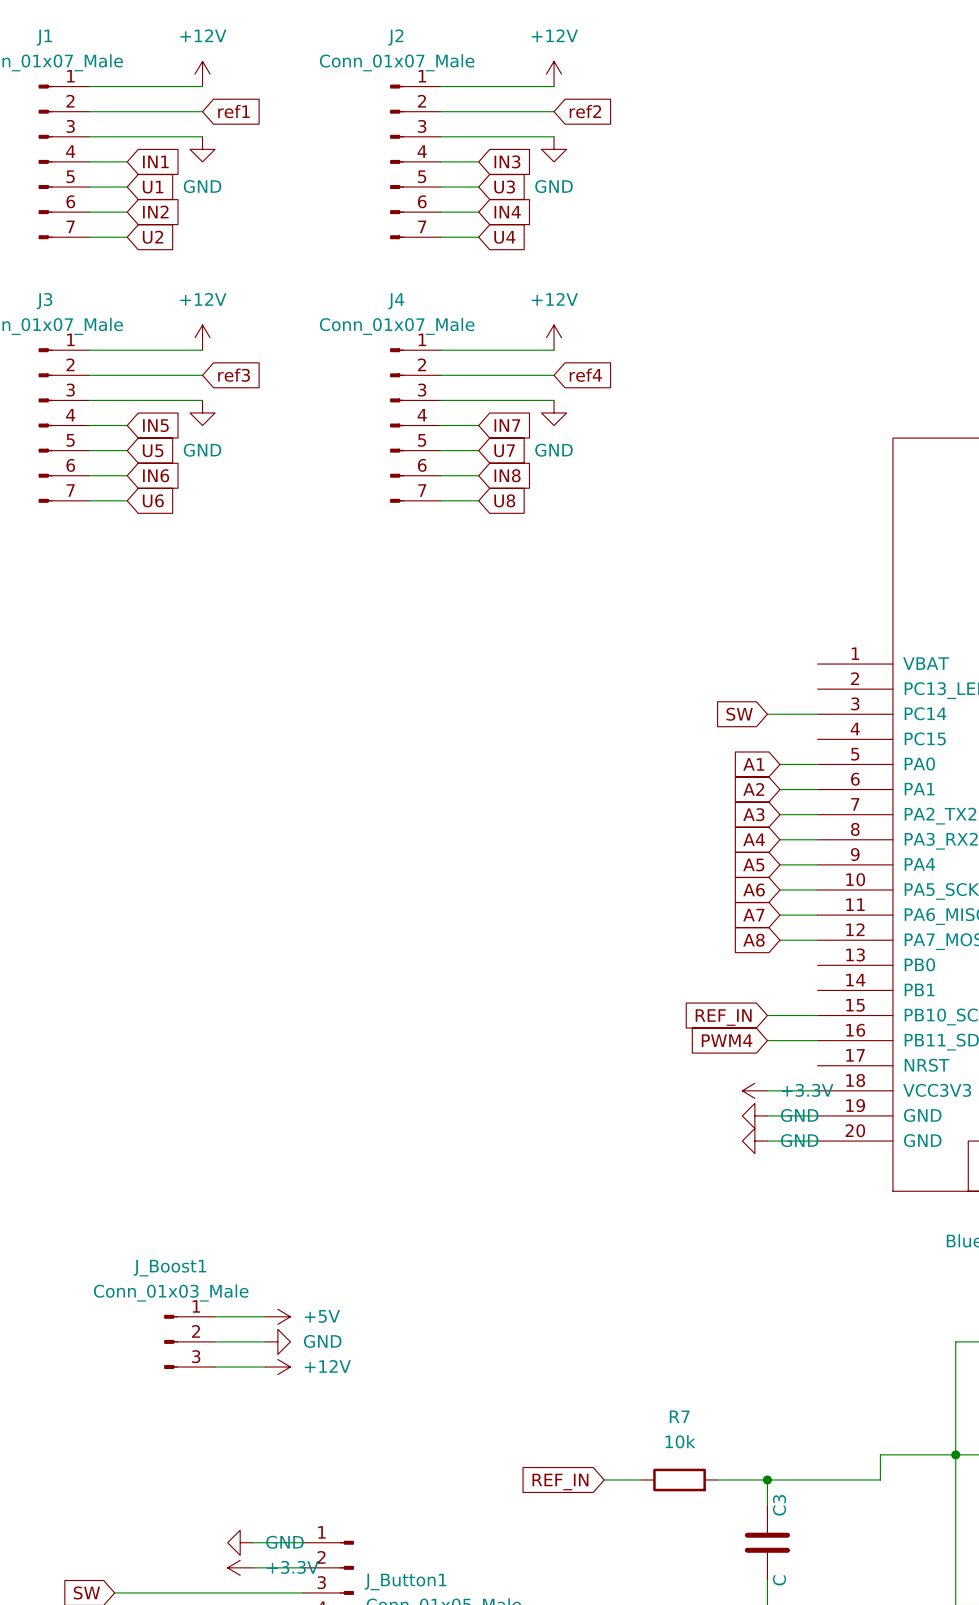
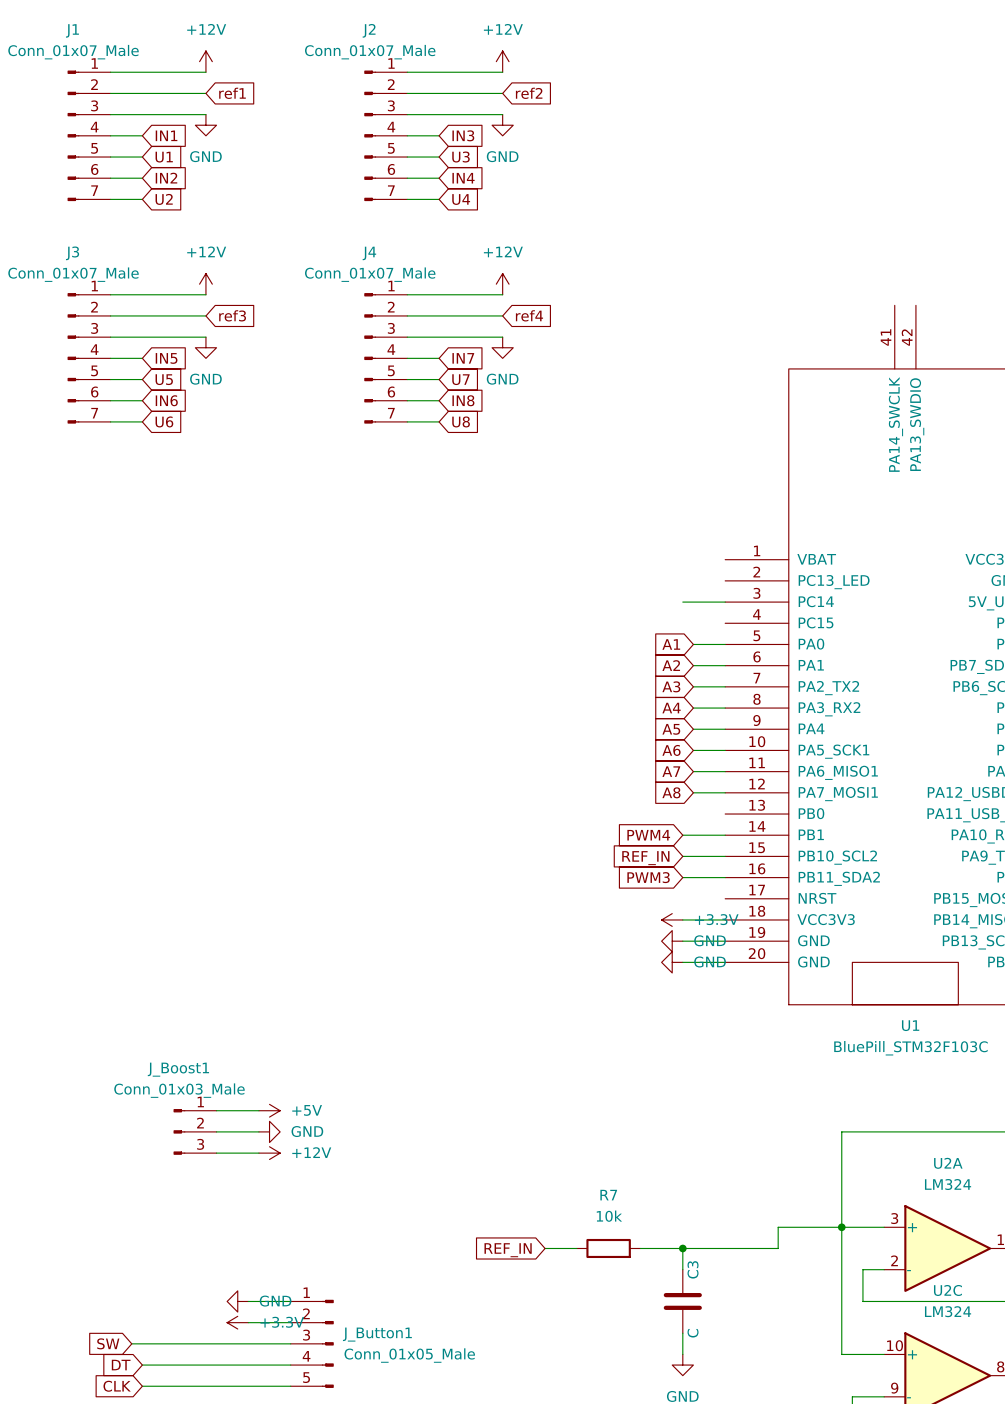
global label: SW (739, 714) -> none
global label: none -> PWM4 (648, 835)
wire: none -> (682, 835) (725, 835)
global label: PWM4 (727, 1040) -> PWM3 (648, 877)

